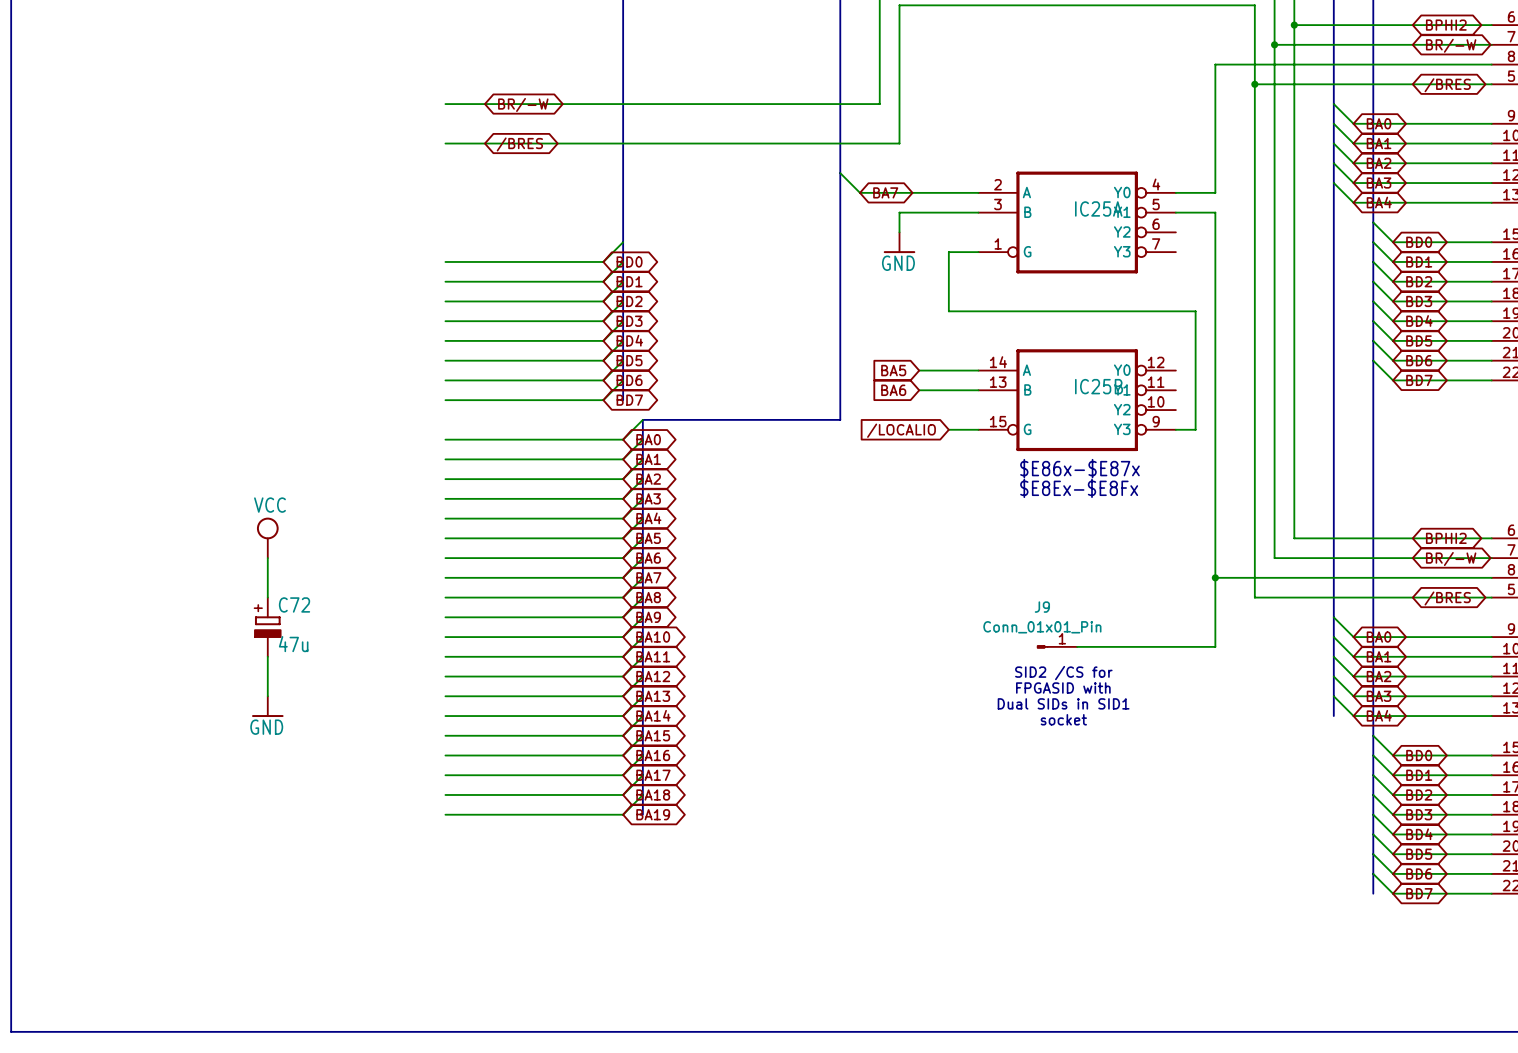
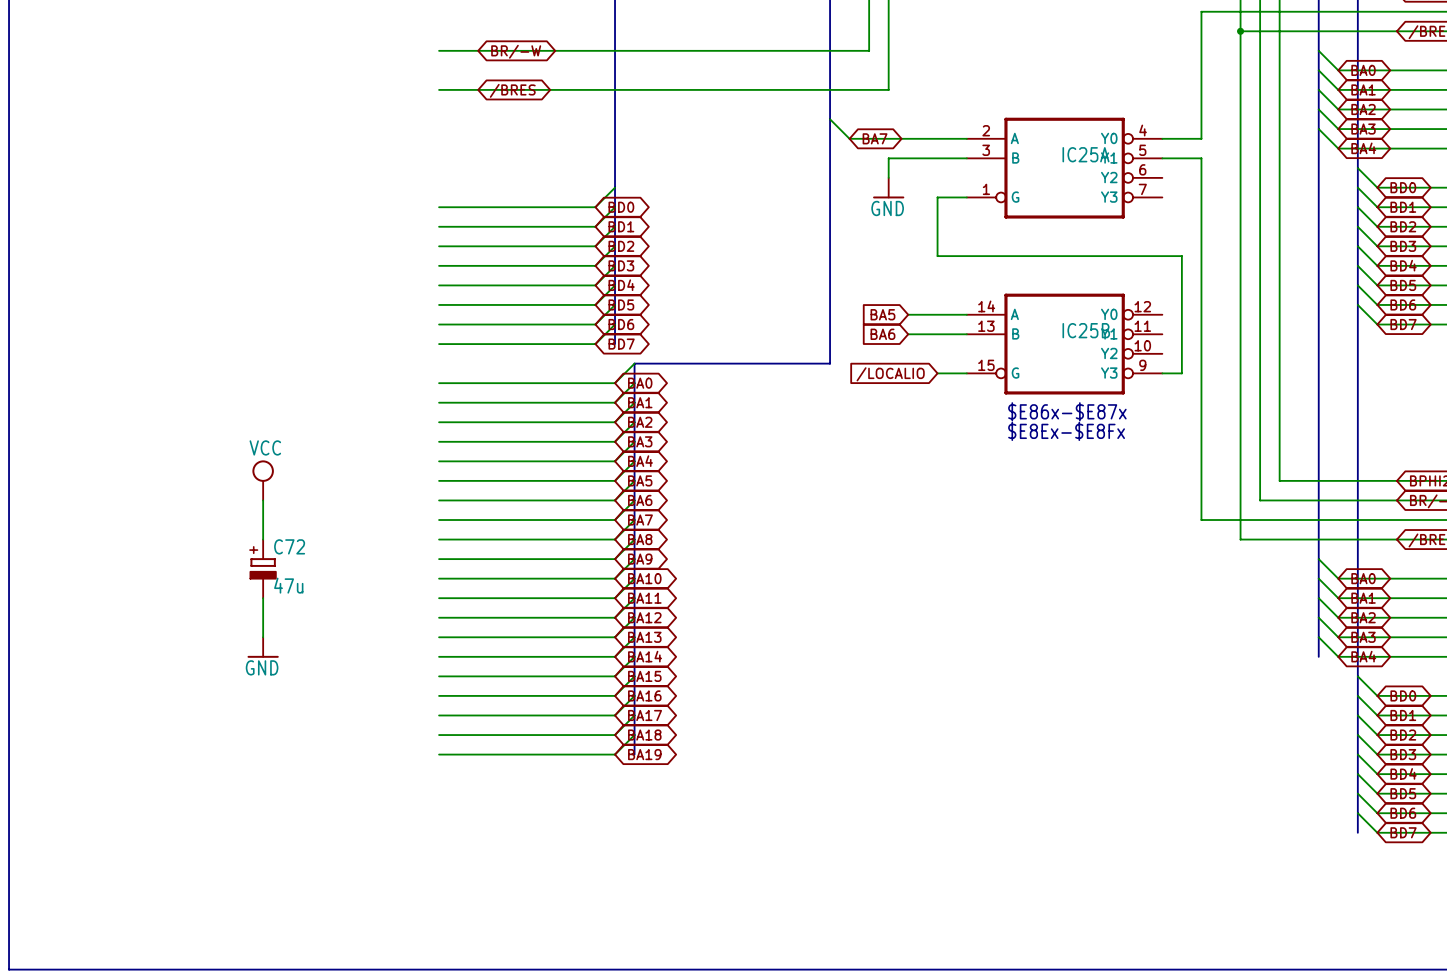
wire: (1215, 577) (1215, 646) (1077, 646) -> none
junction: (1215, 577) -> none
J9: Conn_01x01_Pin (1057, 646) -> none
text: SID2 /CS for (1063, 673) -> none
text: FPGASID with (1063, 688) -> none
text: Dual SIDs in SID1 (1063, 703) -> none
text: socket (1063, 719) -> none

